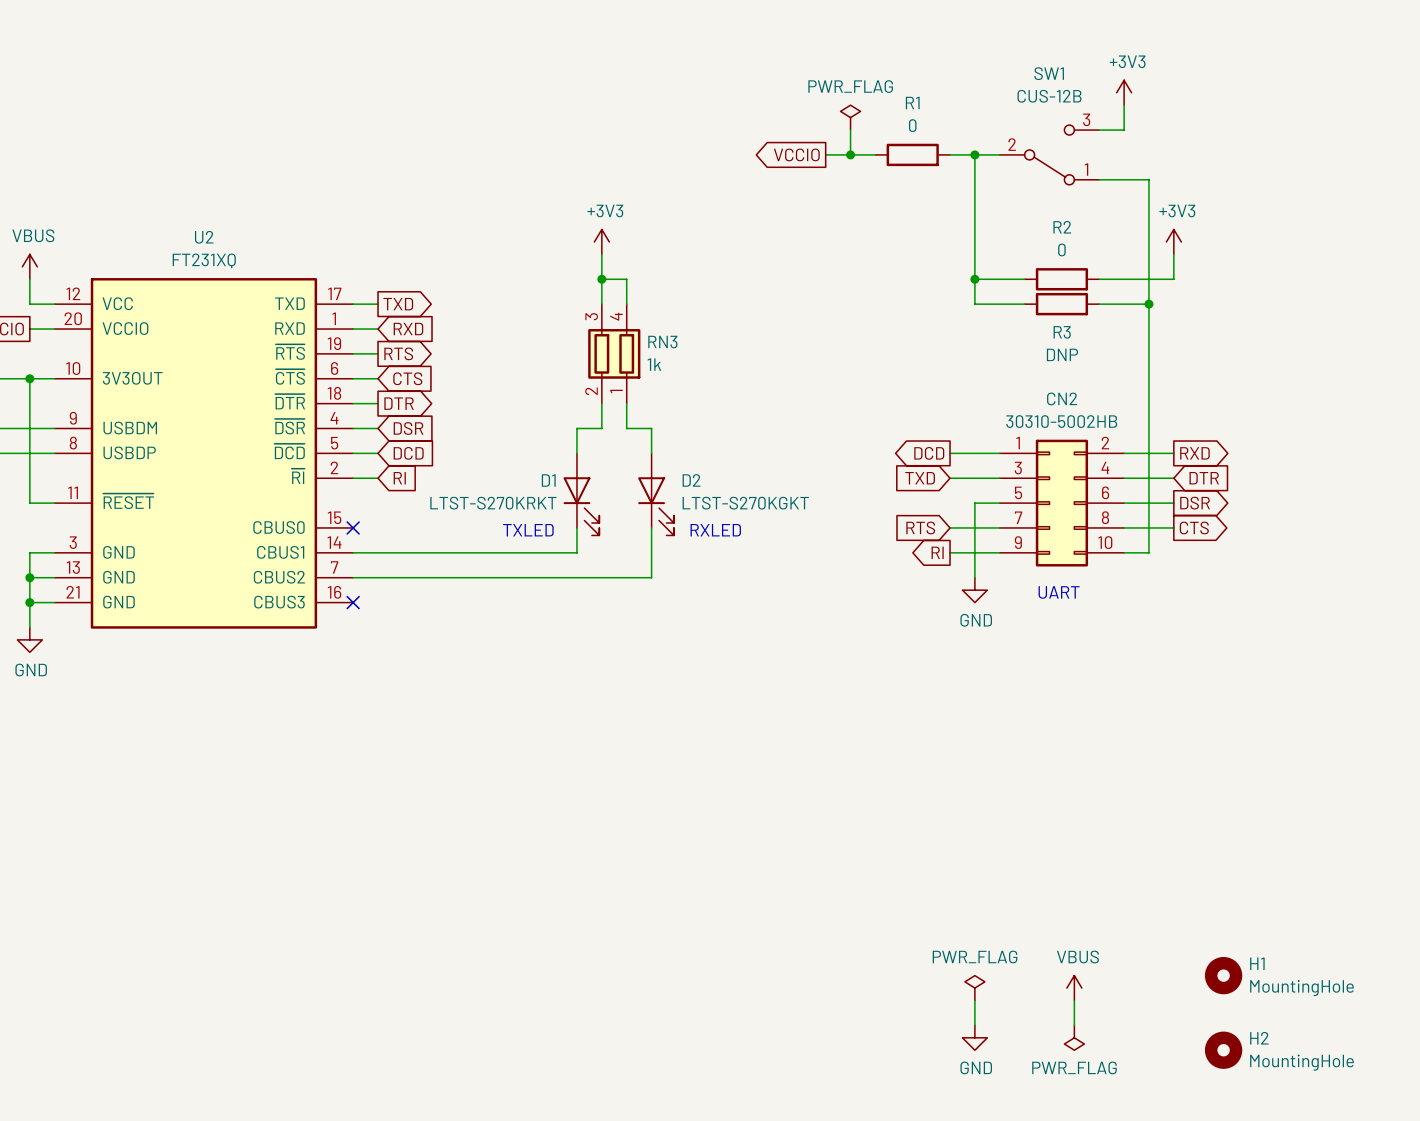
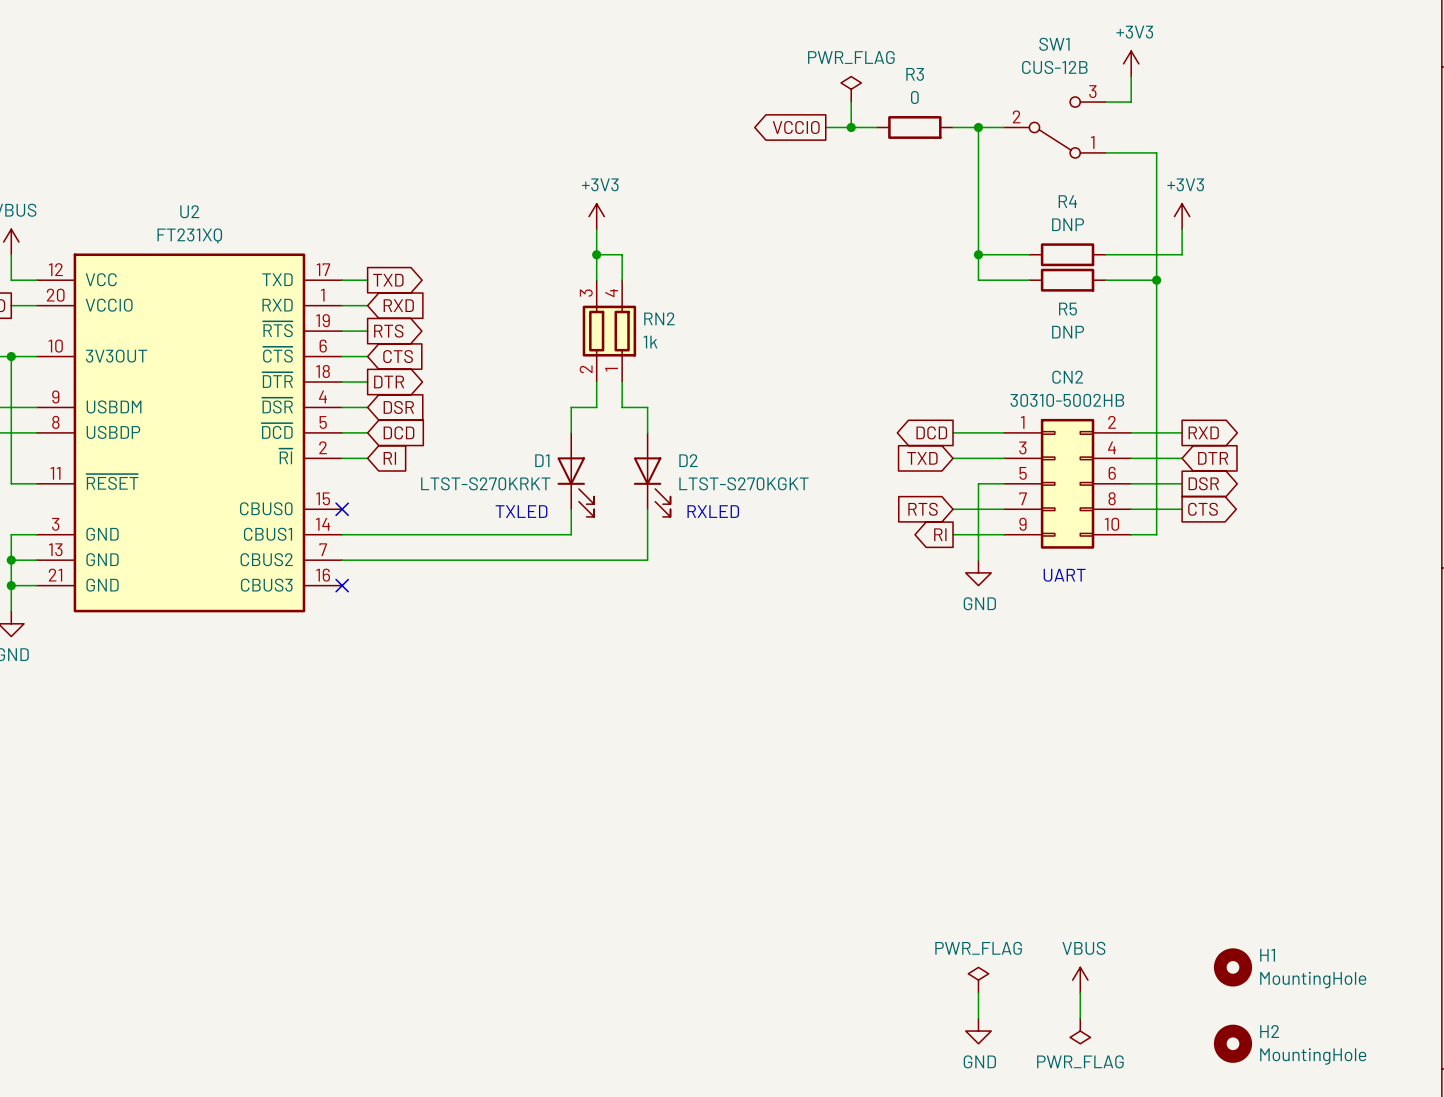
R1 name: R1 (912, 102) -> R3 (915, 74)
R2 name: R2 (1062, 227) -> R4 (1067, 201)
R2 value: 0 (1061, 249) -> DNP (1068, 224)
R3 name: R3 (1062, 332) -> R5 (1067, 309)
RN3 name: RN3 (662, 342) -> RN2 (659, 318)

